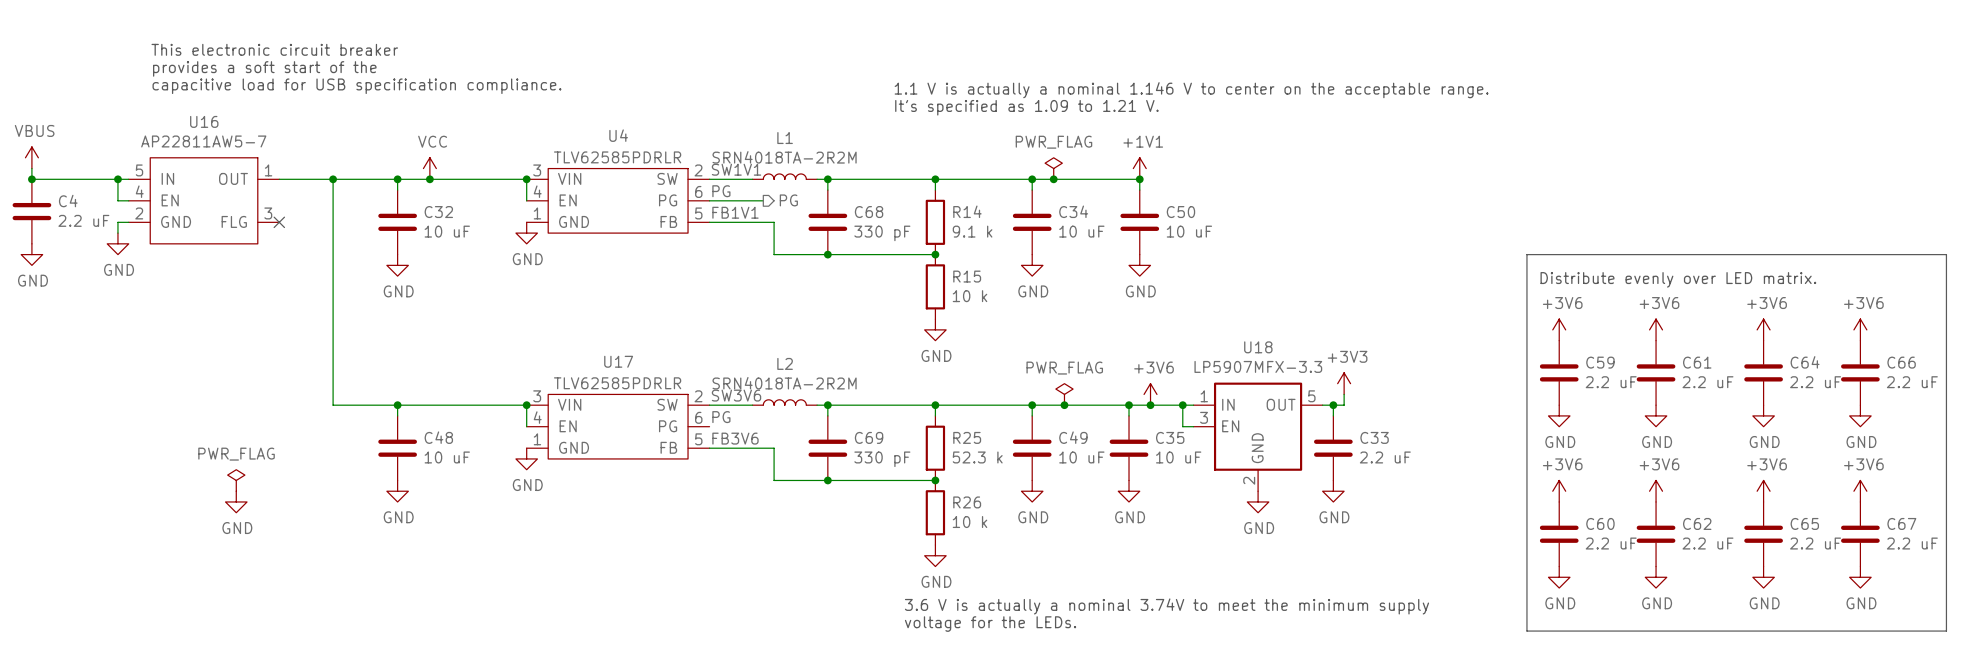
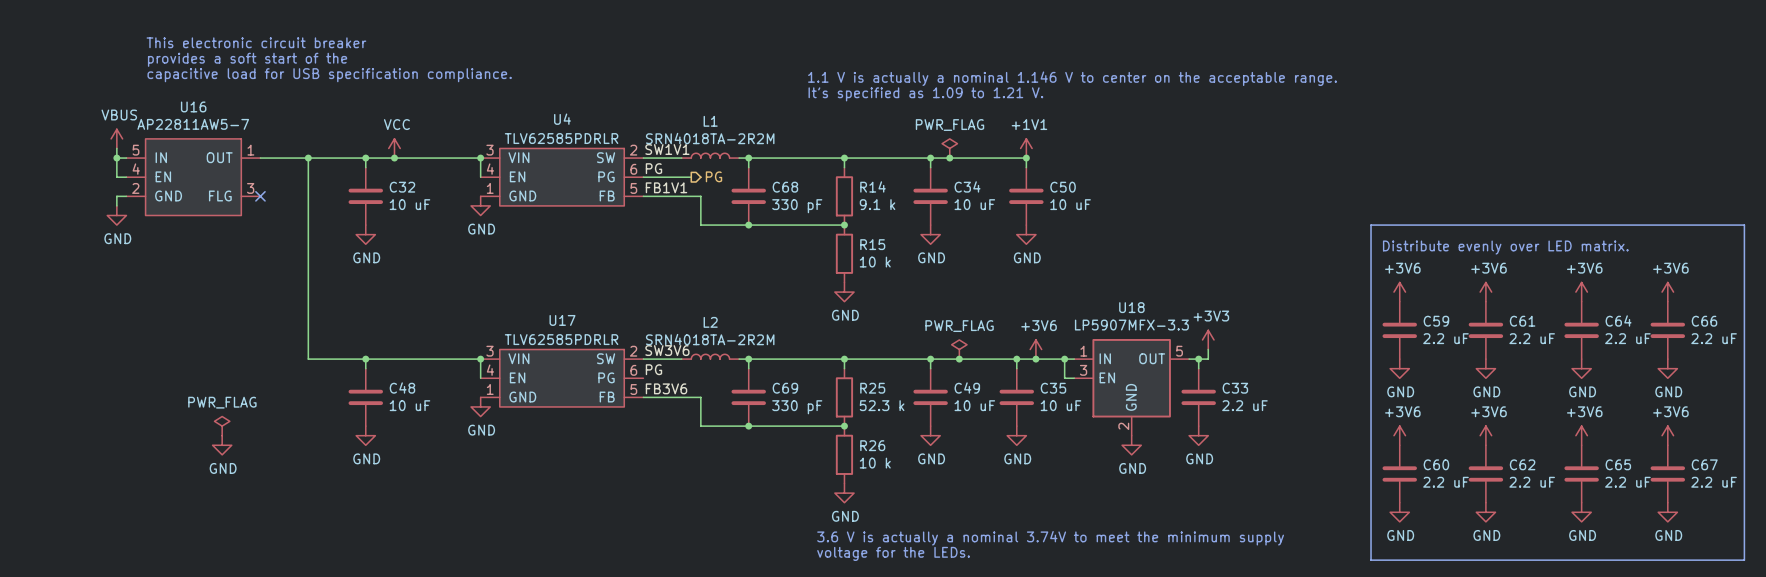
power symbol position: VBUS (31, 157) -> VBUS (116, 138)
wire: (31, 168) (31, 179) (117, 179) -> (116, 148) (116, 158)
junction: (31, 179) -> none
C4: 2.2 uF (31, 211) -> none
power symbol: GND (31, 254) -> none

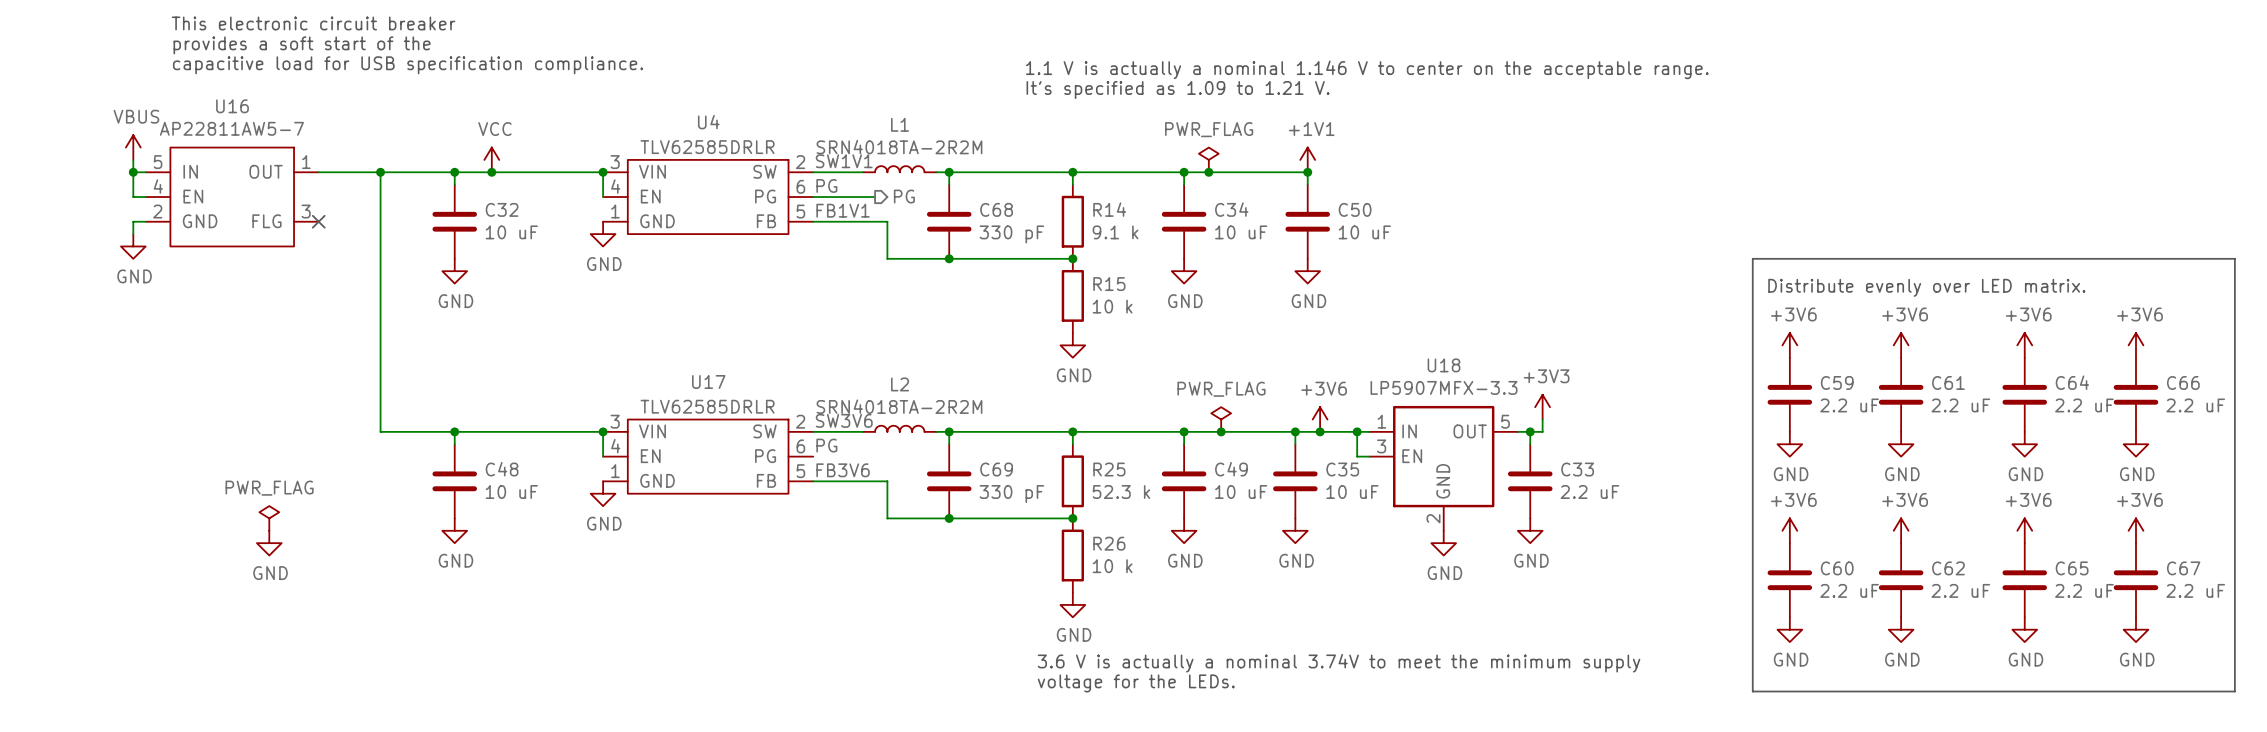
U4 value: TLV62585PDRLR (561, 138) -> TLV62585DRLR (707, 147)
U17 value: TLV62585PDRLR (561, 339) -> TLV62585DRLR (707, 406)

